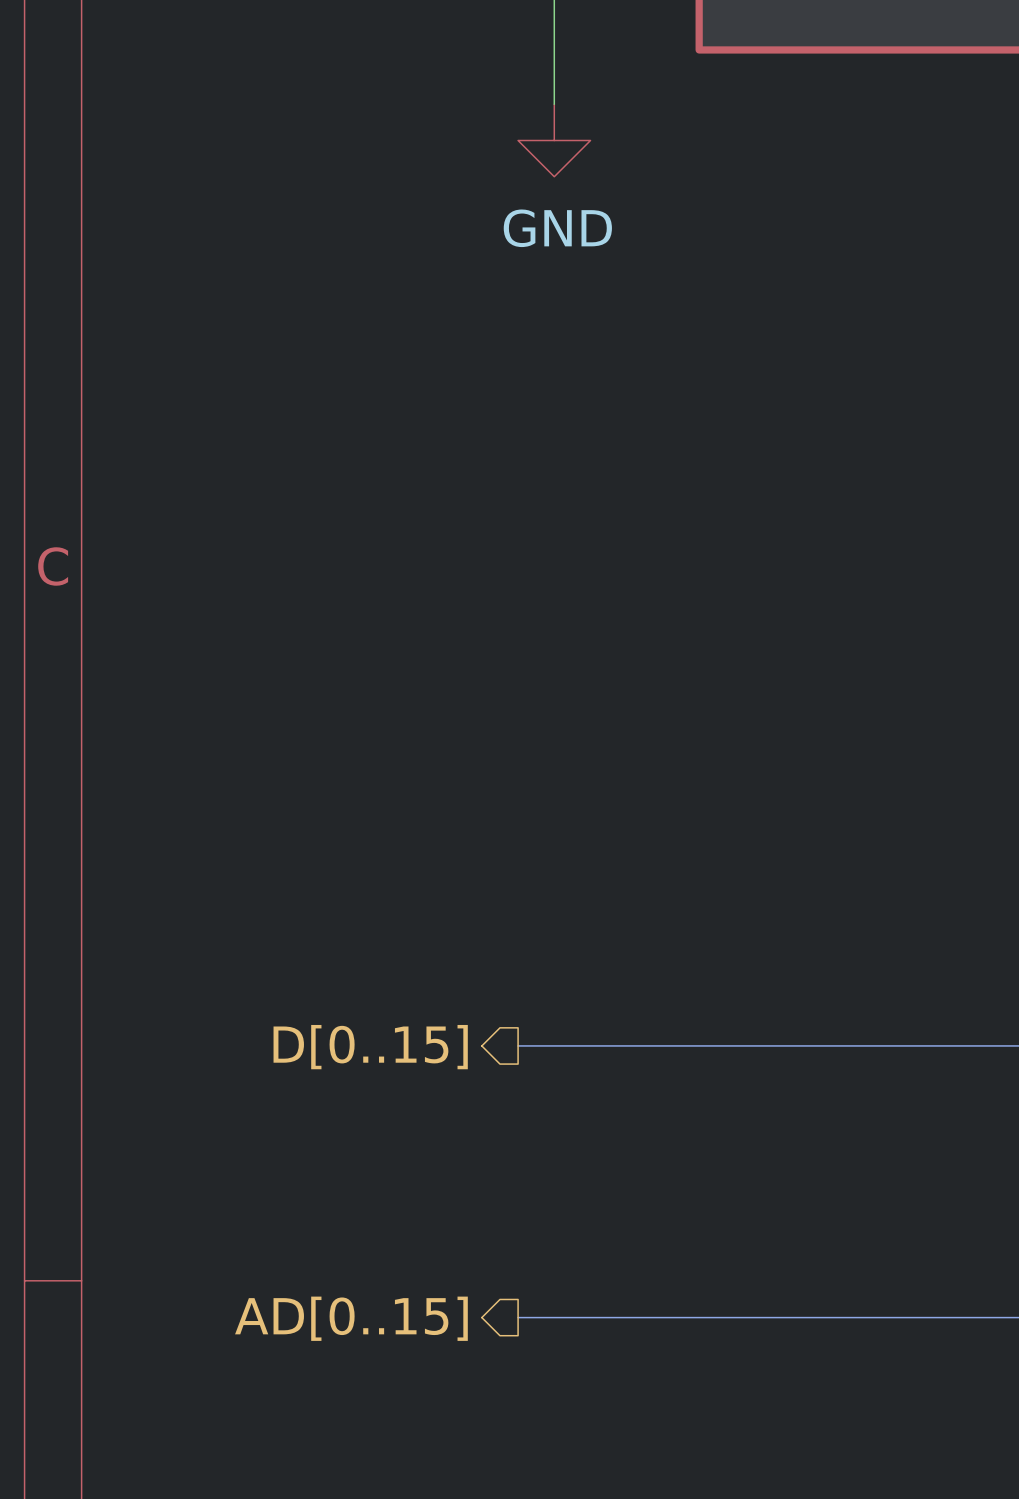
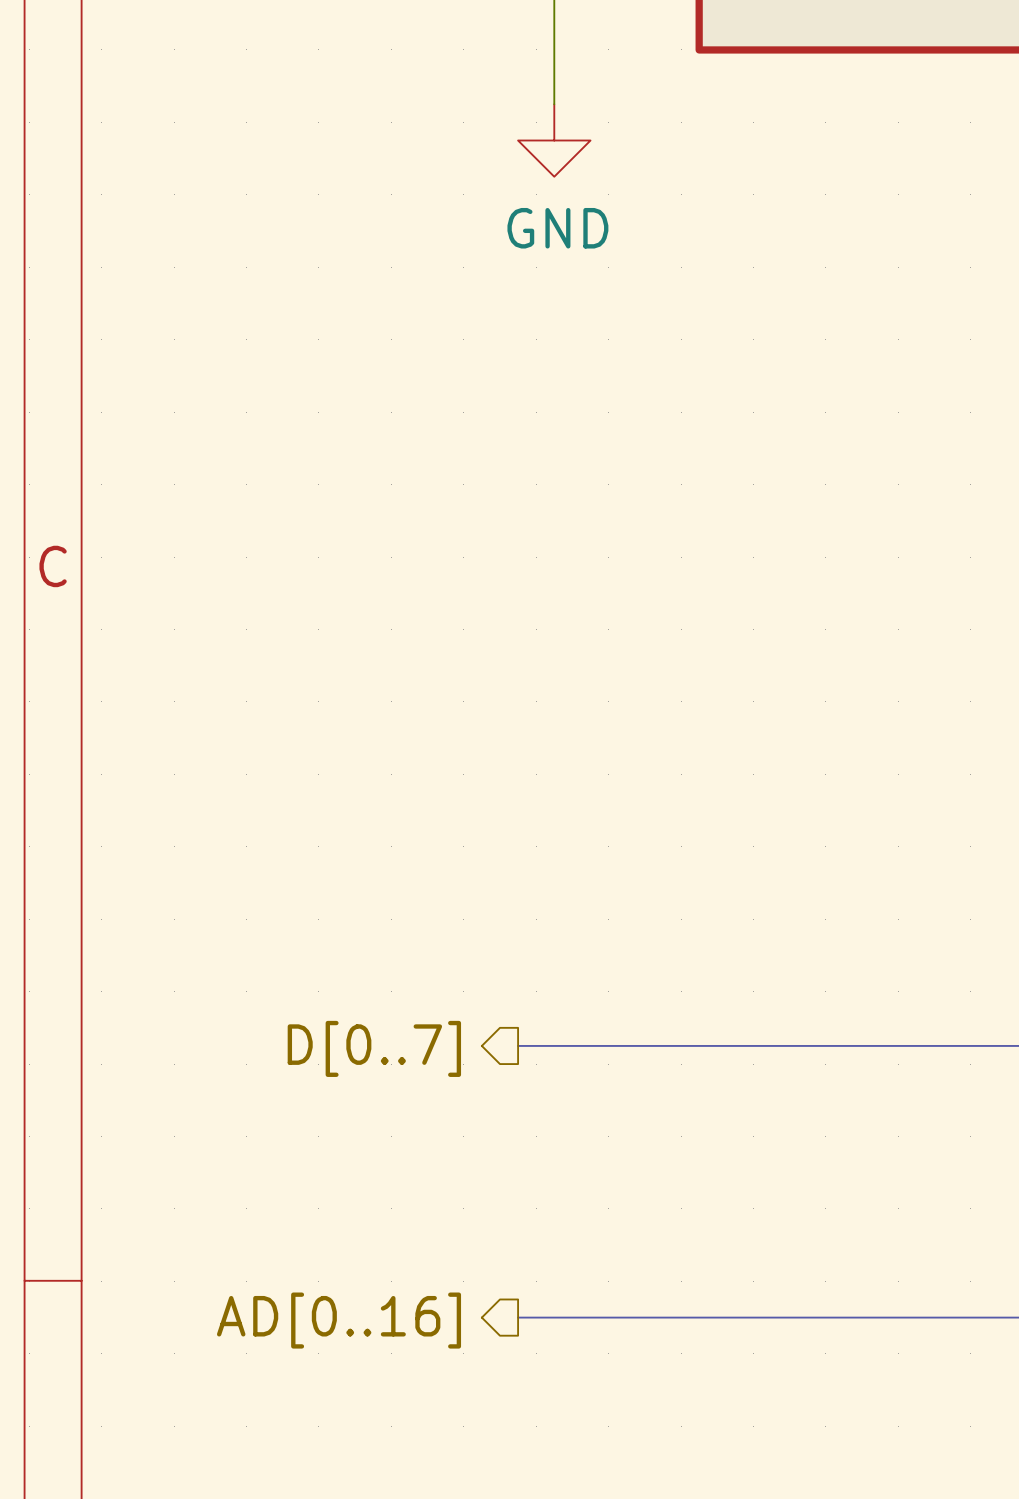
hierarchical label: D[0..15] (370, 1047) -> D[0..7] (374, 1048)
hierarchical label: AD[0..15] (351, 1318) -> AD[0..16] (339, 1320)

